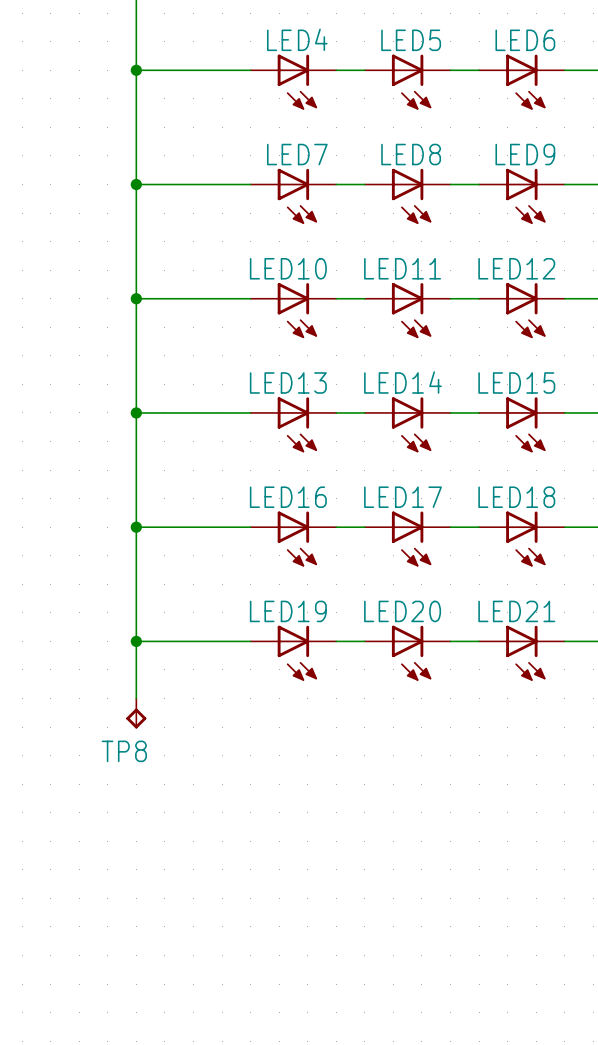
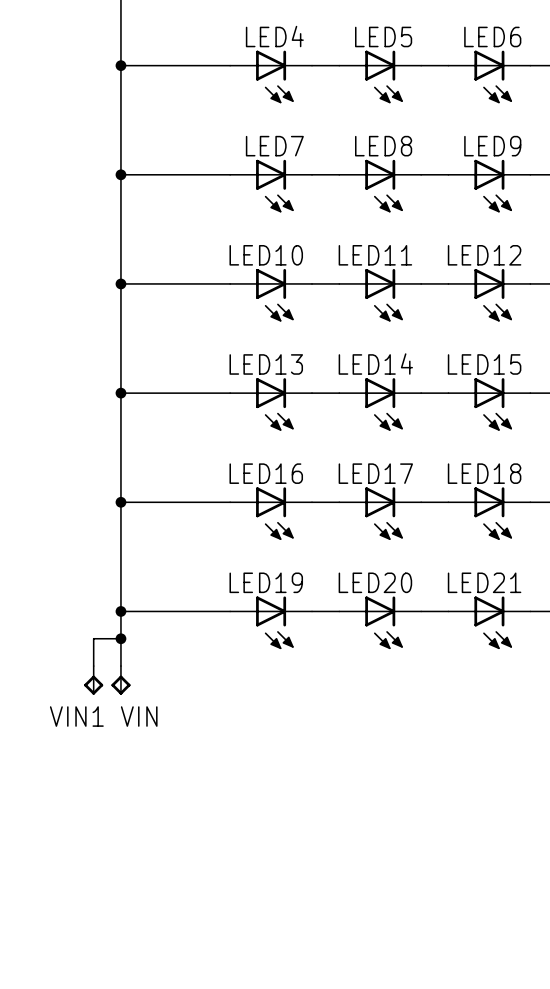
wire: none -> (120, 638) (93, 638) (93, 666)
junction: none -> (120, 638)
VIN1: none -> (93, 680)
TP8 name: TP8 (124, 751) -> VIN (139, 716)

